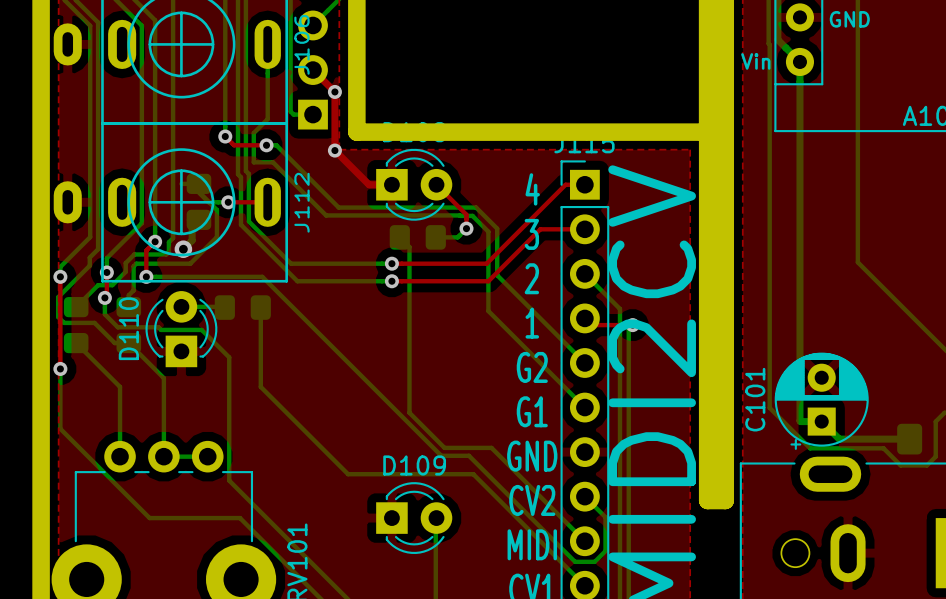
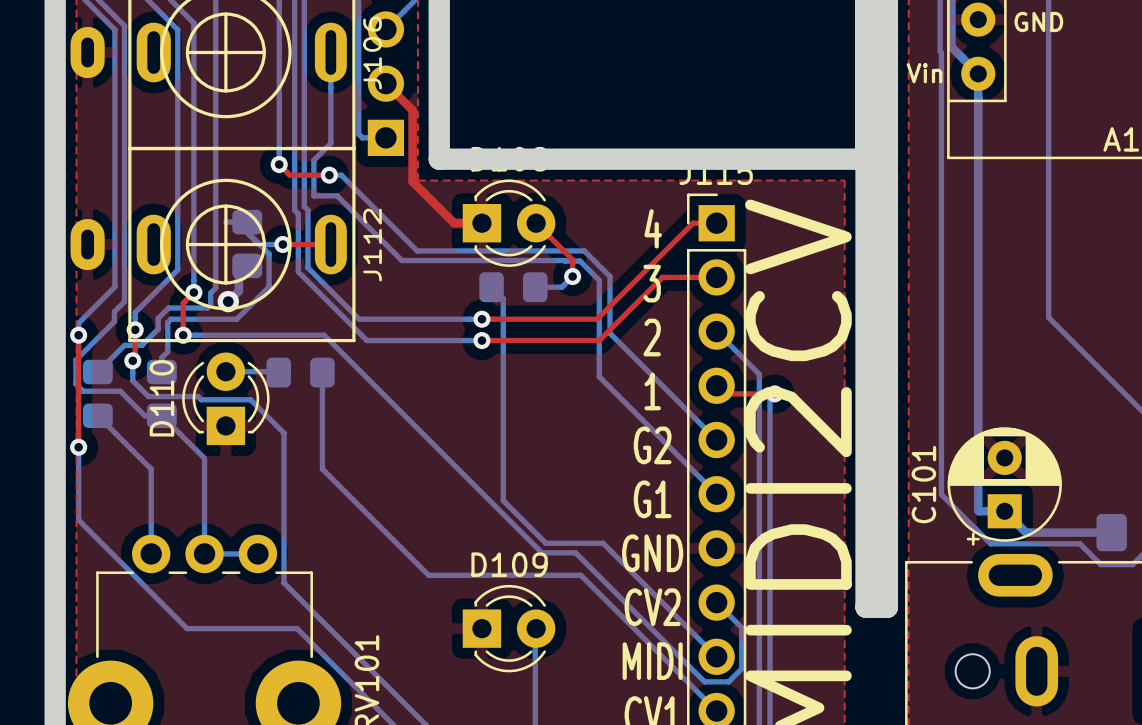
via: (334, 91) -> none
via: (334, 150) -> none

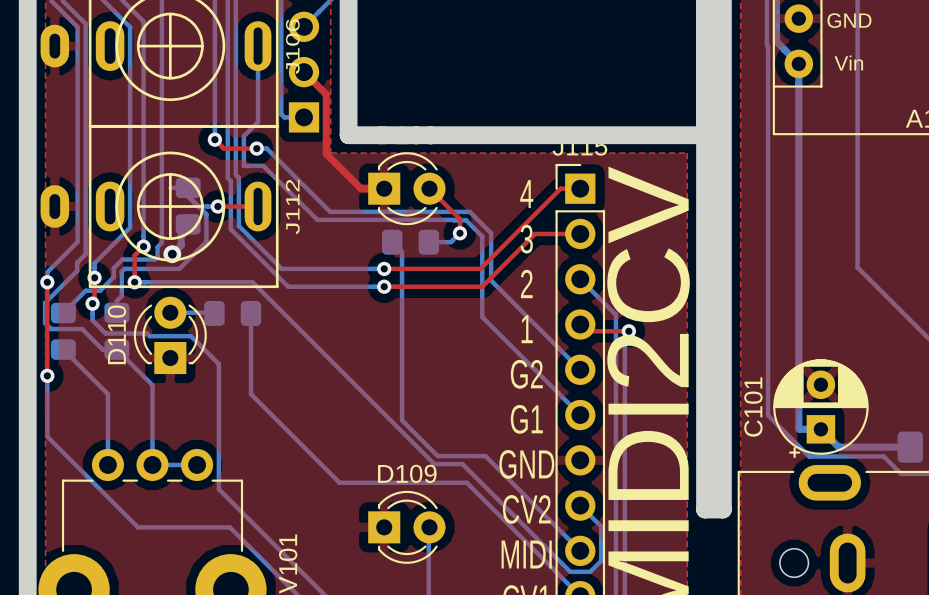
text position: Vin (924, 73) -> Vin (848, 63)

